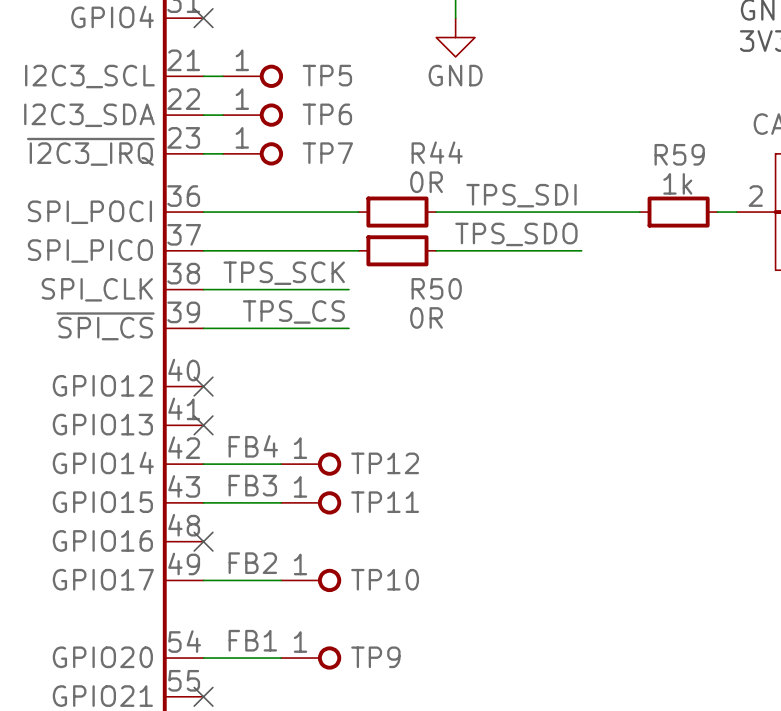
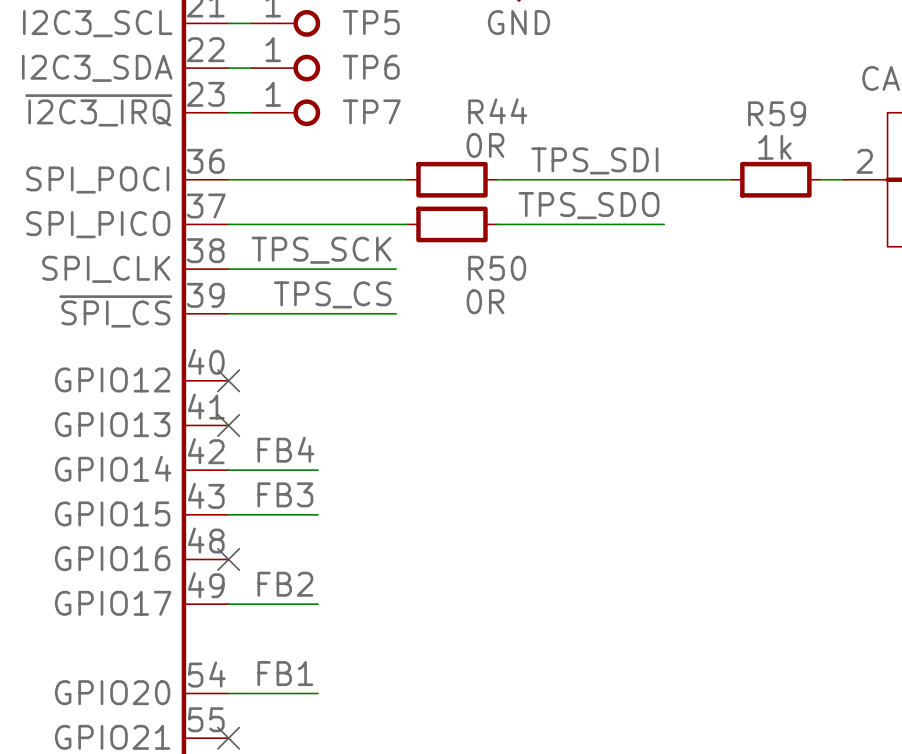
TP12: (311, 464) -> none
TP11: (311, 502) -> none
TP10: (311, 580) -> none
TP9: (311, 658) -> none

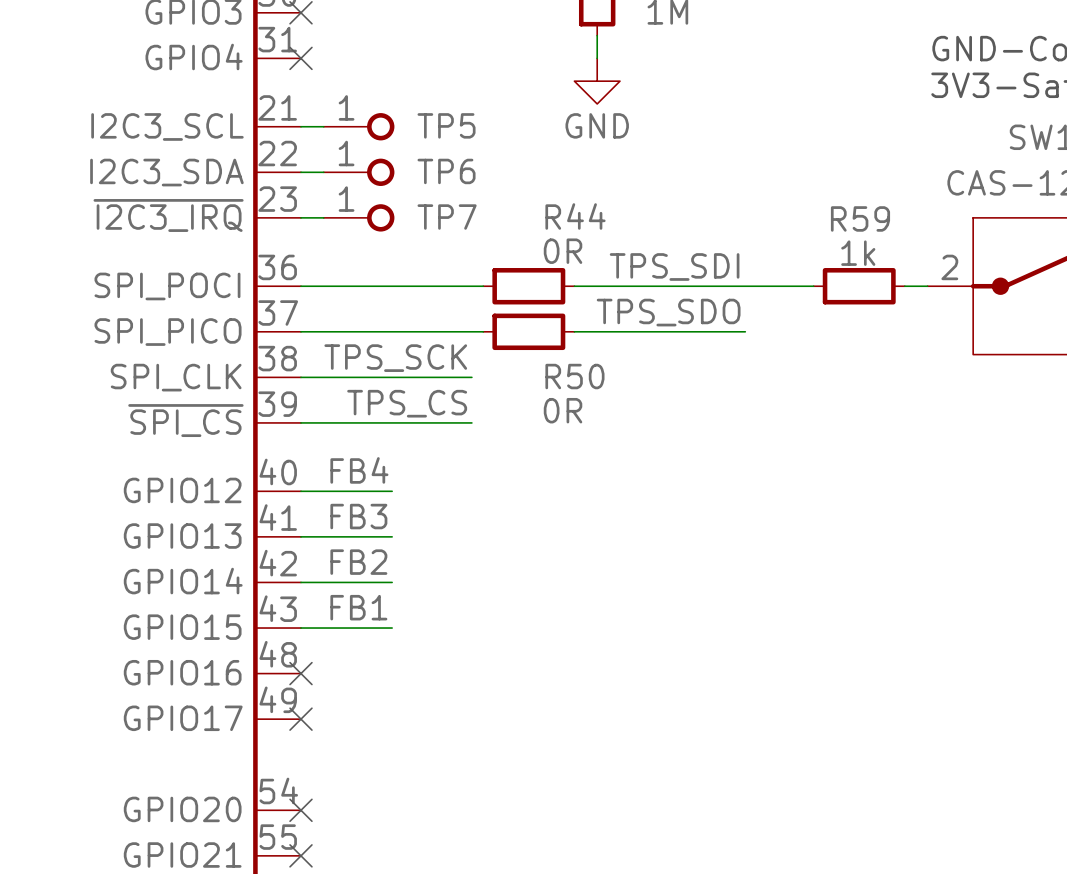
label: none -> FB4 (359, 470)
no-connect mark: (228, 380) -> none
label: none -> FB3 (358, 516)
no-connect mark: (228, 425) -> none
label: FB4 (285, 449) -> FB2 (358, 562)
label: FB3 (285, 494) -> FB1 (358, 607)
label: FB2 (285, 584) -> none
wire: (228, 604) (317, 604) -> (300, 536) (392, 536)
no-connect mark: none -> (300, 719)
label: FB1 (285, 673) -> none
wire: (228, 693) (317, 693) -> (300, 491) (392, 491)
no-connect mark: none -> (300, 810)

